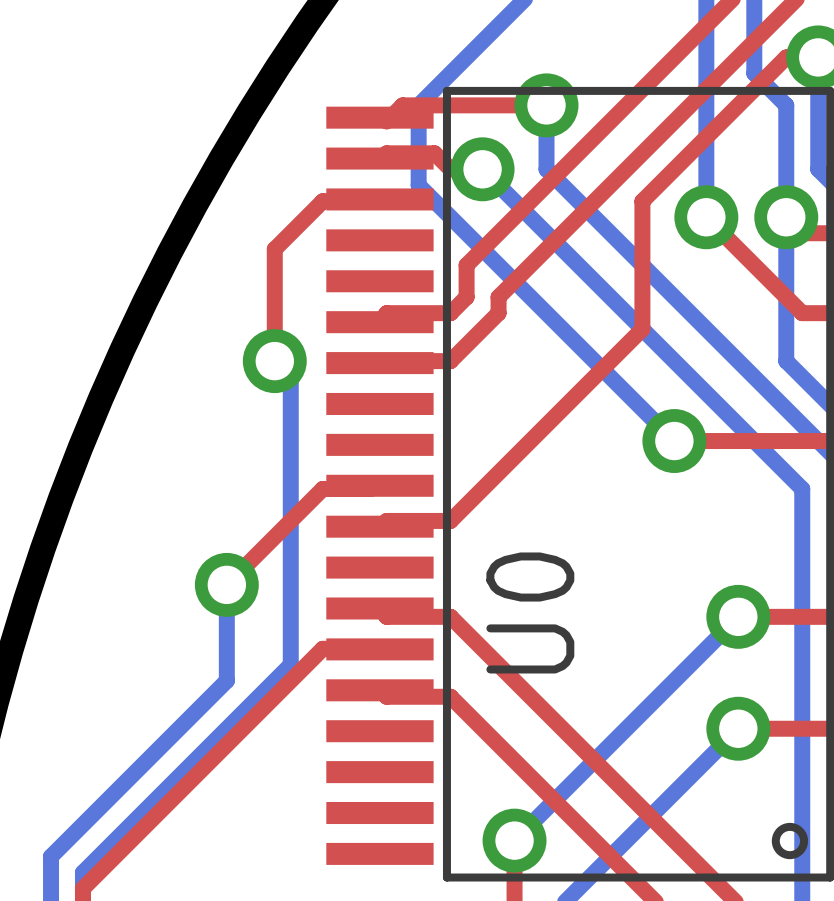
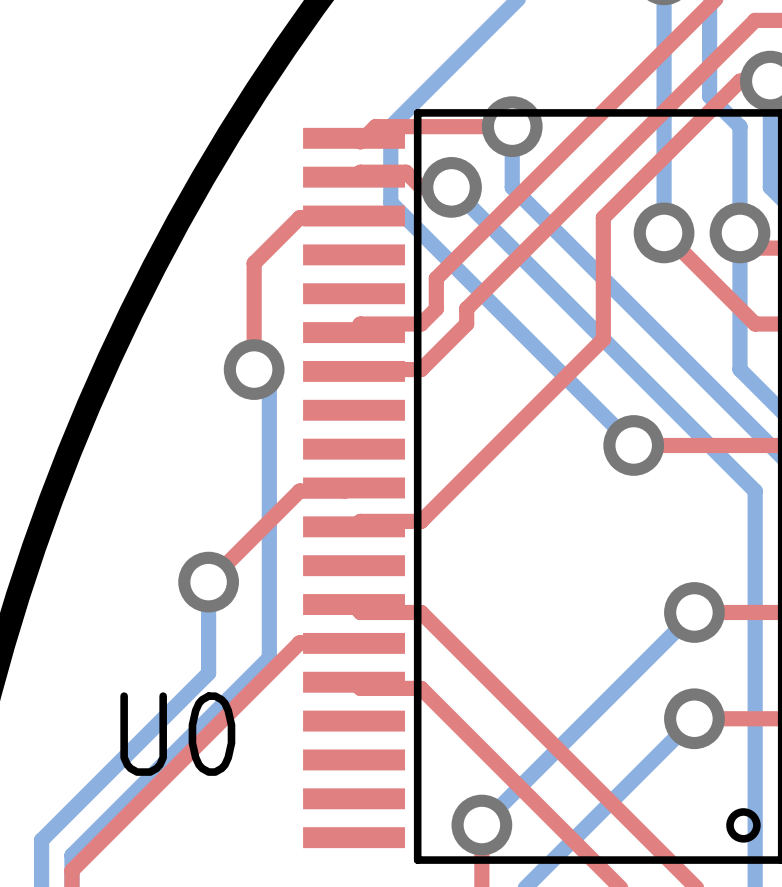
U0 name rotation: 0° (530, 612) -> 90° clockwise (177, 734)
U0 name position: U0 (530, 612) -> U0 (177, 734)

